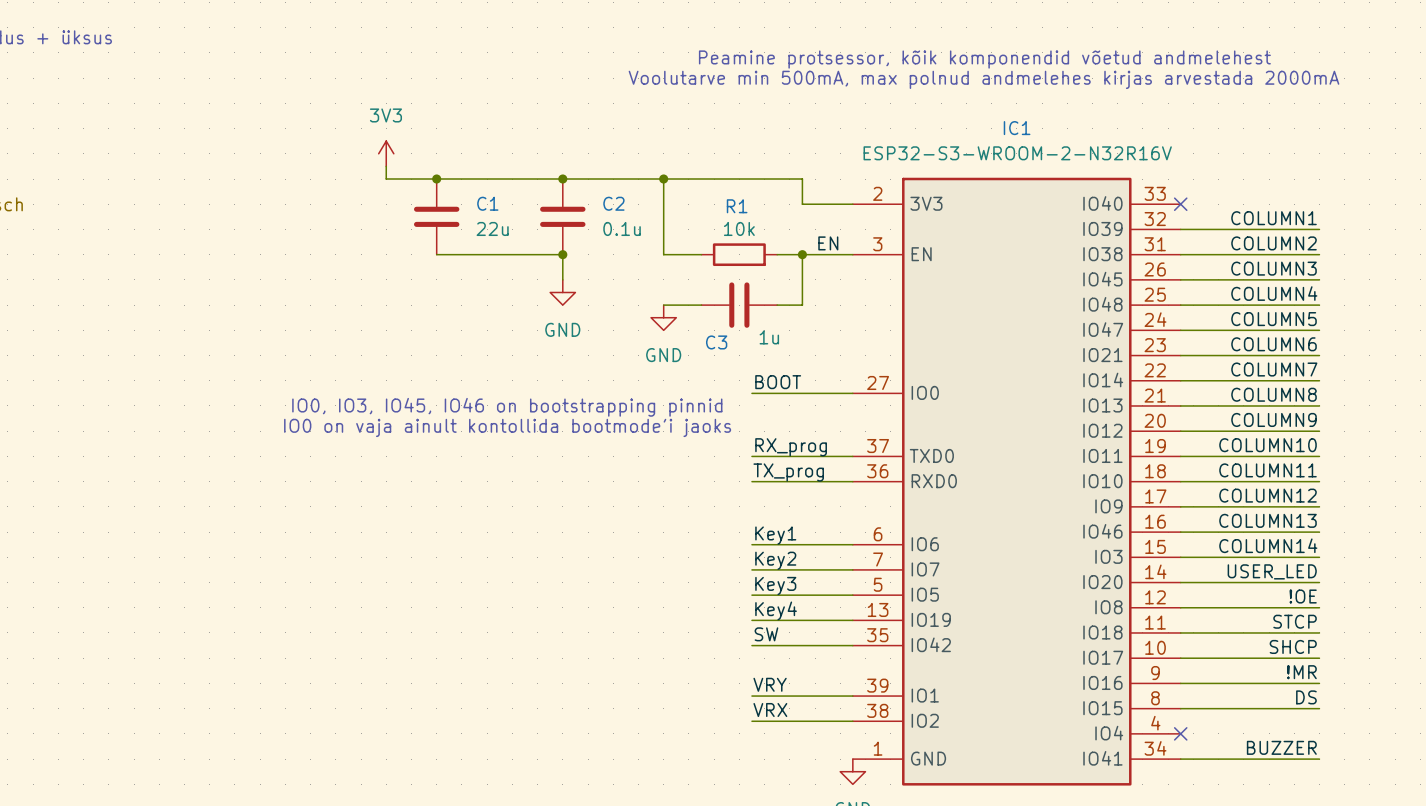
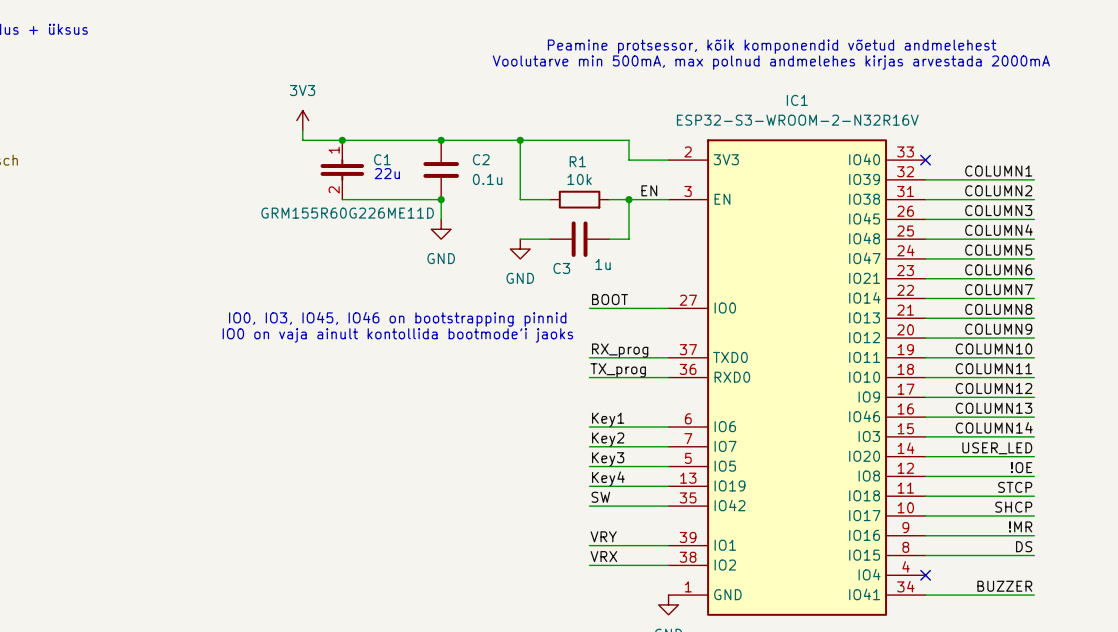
C1 symbol: [413, 179, 460, 255] -> [320, 140, 365, 200]
text: none -> 22u (387, 173)
C1 value: 22u (492, 228) -> GRM155R60G226ME11D (347, 213)

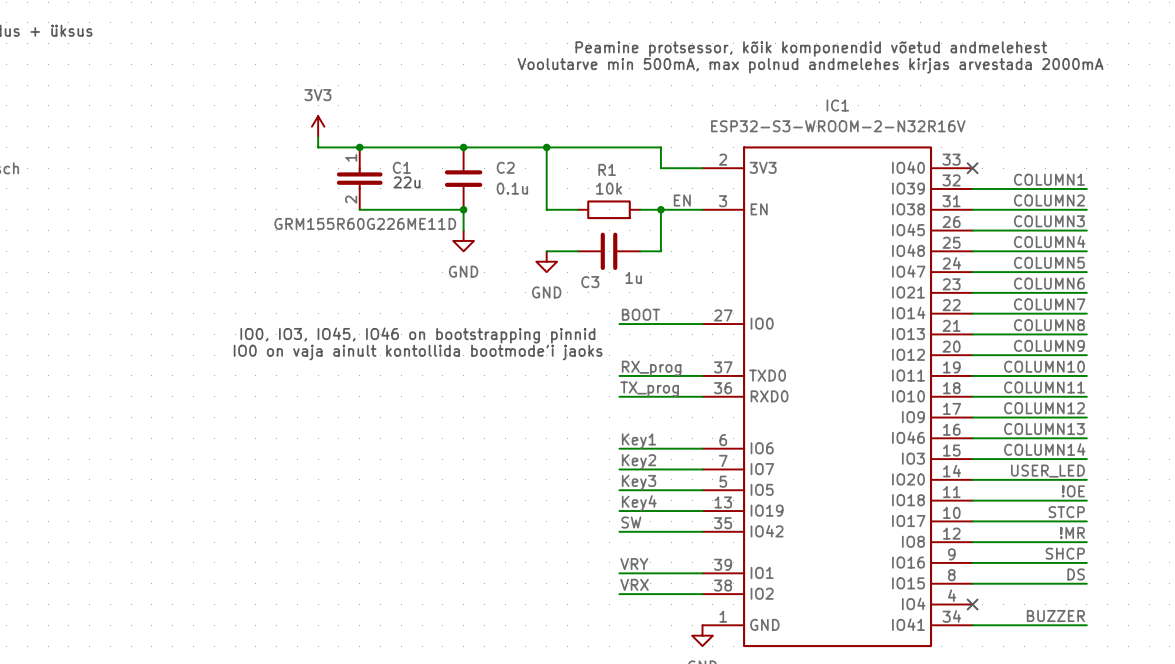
IC1 pin number: 12 (905, 468) -> 11 (951, 492)
IC1 pin name: IO8 (869, 476) -> IO18 (908, 500)
IC1 pin number: 11 (905, 488) -> 10 (951, 512)
IC1 pin name: IO18 (864, 495) -> IO17 (908, 521)
IC1 pin number: 10 (905, 507) -> 12 (951, 533)
label: SHCP (1013, 507) -> !MR (1072, 532)
IC1 pin name: IO17 (864, 515) -> IO8 (913, 541)
label: !MR (1020, 526) -> SHCP (1065, 553)

